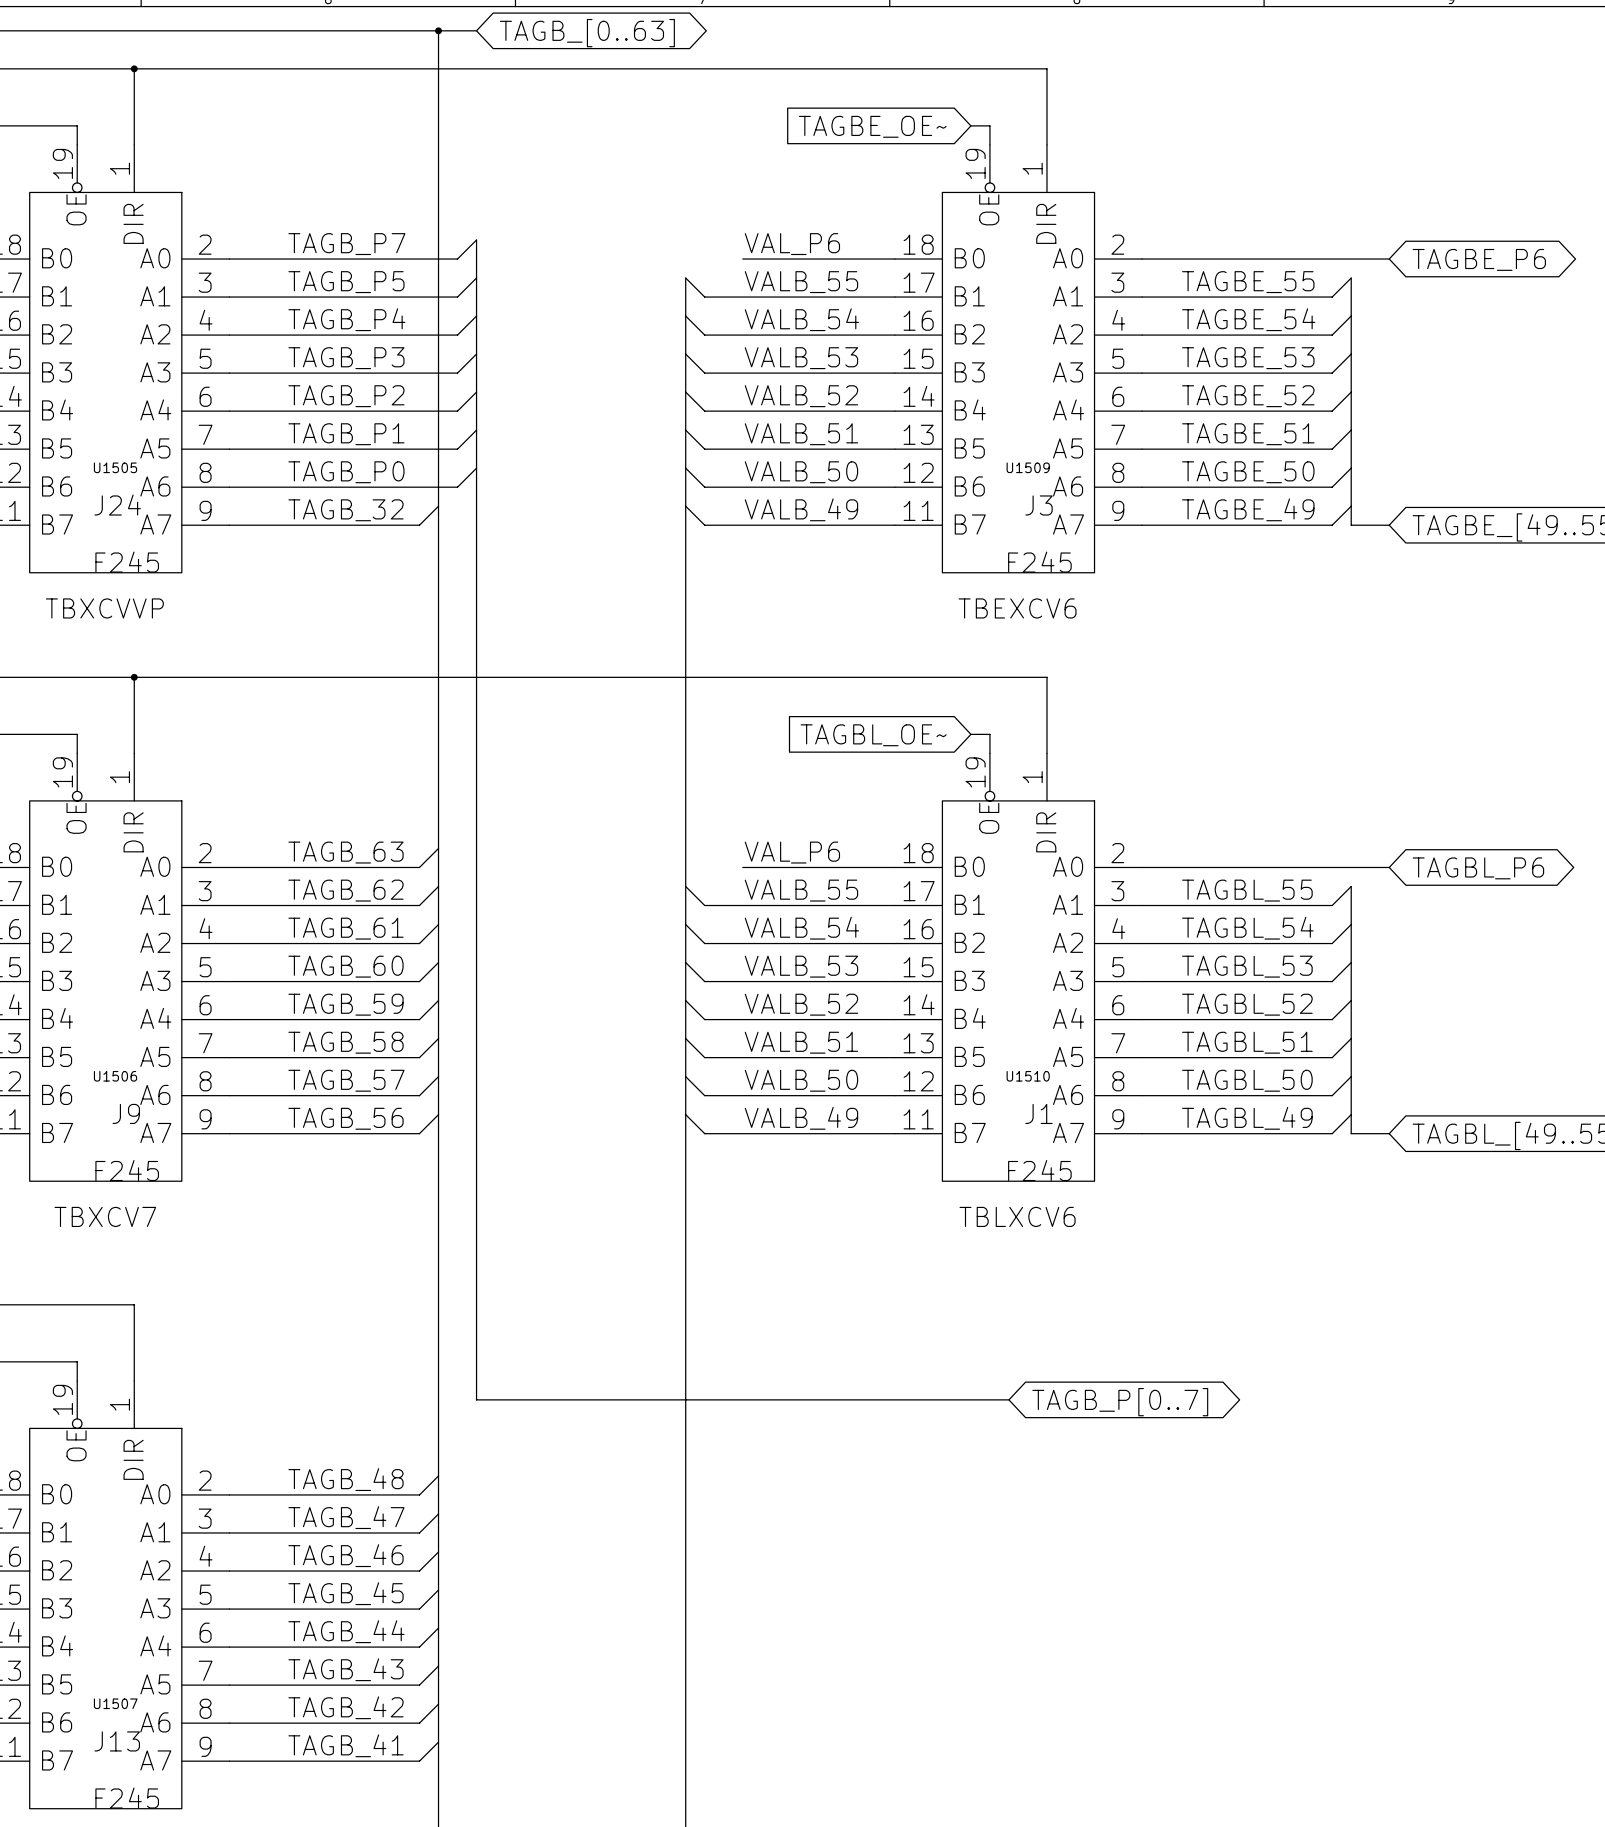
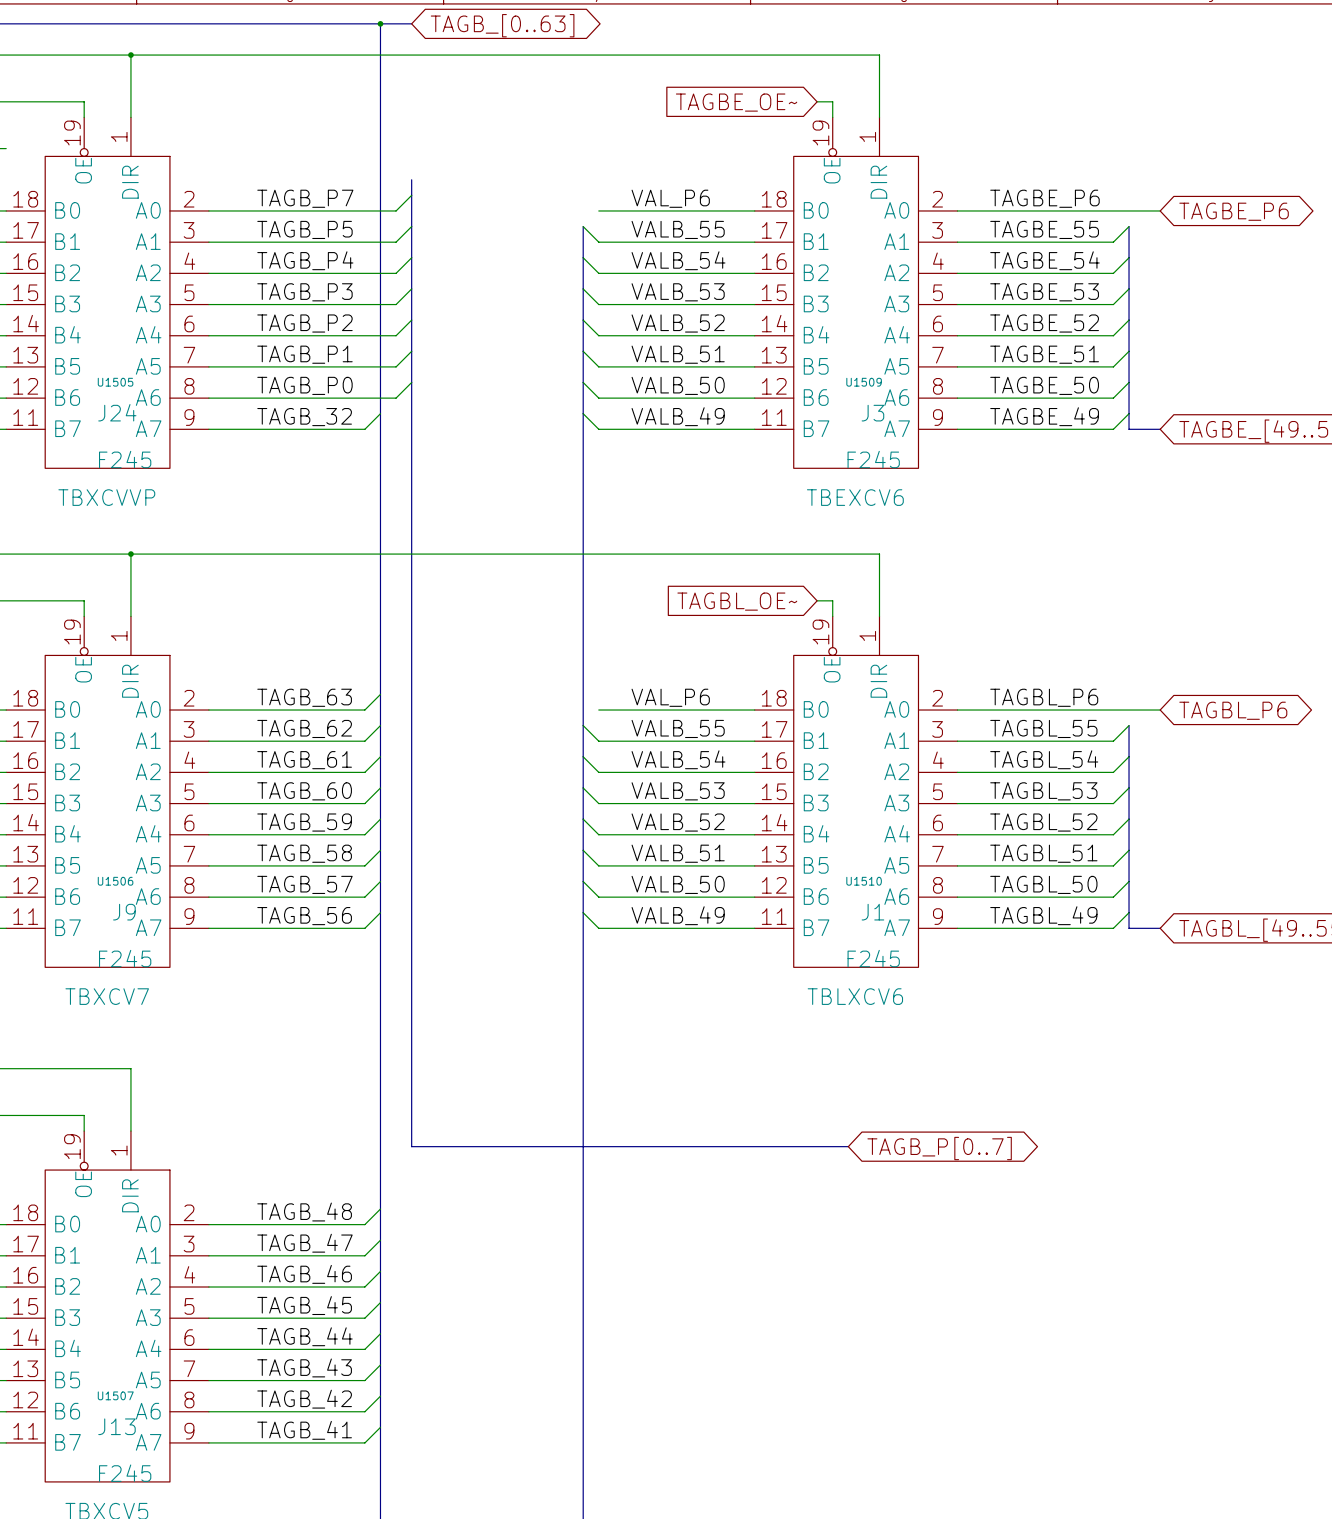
bus: none -> (411, 179) (411, 195)
label: none -> TAGBE_P6 (1044, 198)
wire: none -> (598, 210) (629, 210)
label: none -> TAGBL_P6 (1044, 697)
wire: none -> (598, 710) (629, 710)

